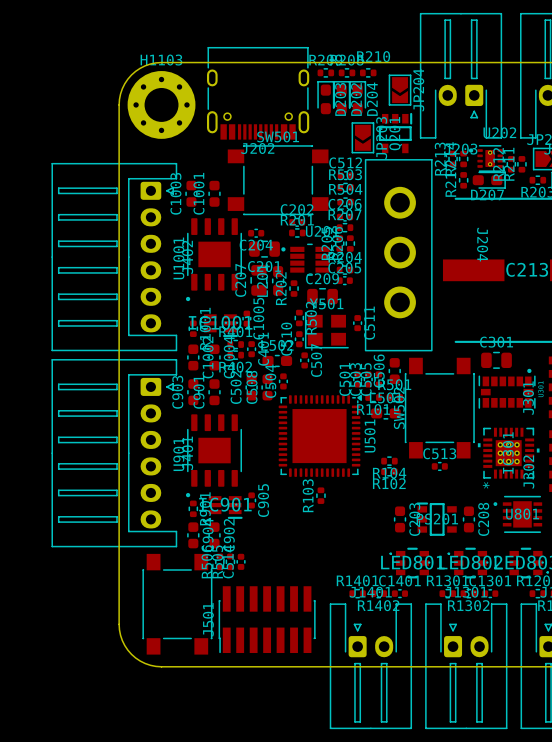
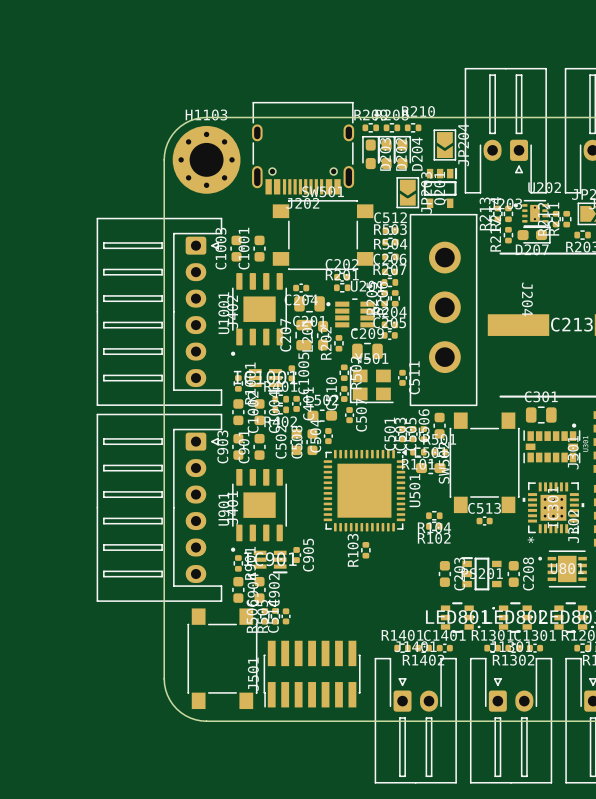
LED801 rotation: 0° (409, 563) -> 180° (460, 617)

